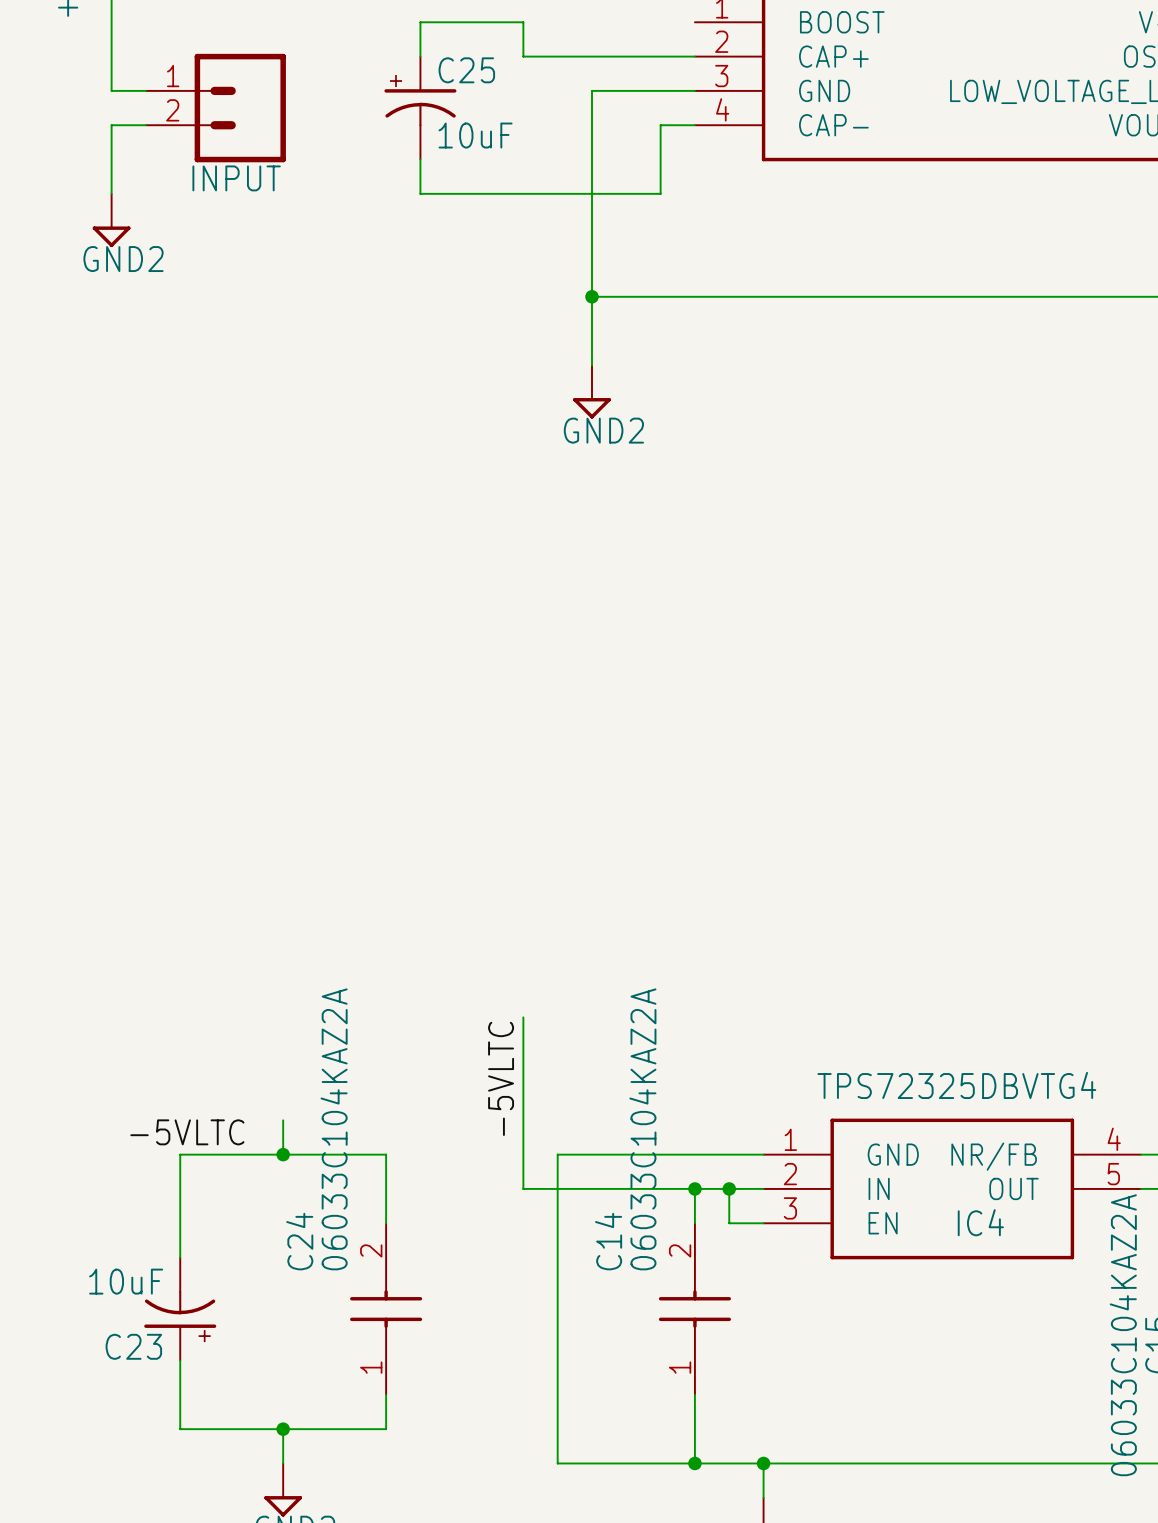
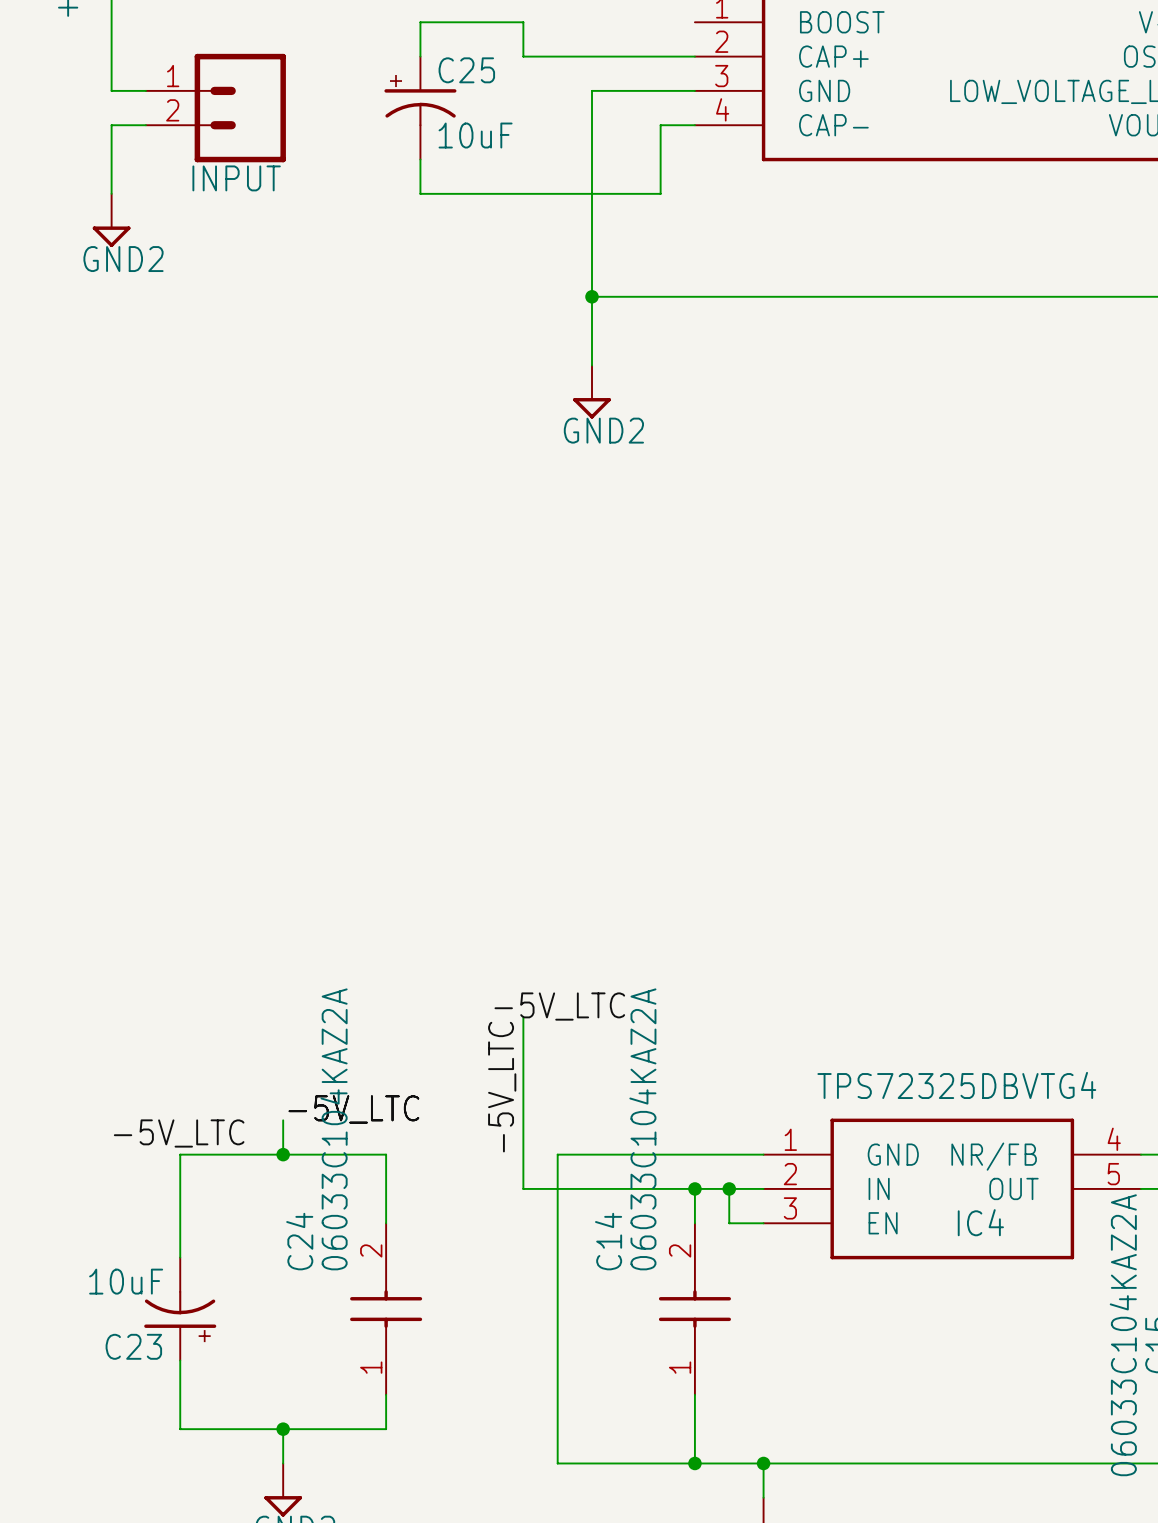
label: none -> -5V_LTC (559, 1006)
label: -5VLTC (501, 1078) -> -5V_LTC (502, 1087)
label: none -> -5V_LTC (353, 1109)
label: -5VLTC (187, 1132) -> -5V_LTC (179, 1133)

